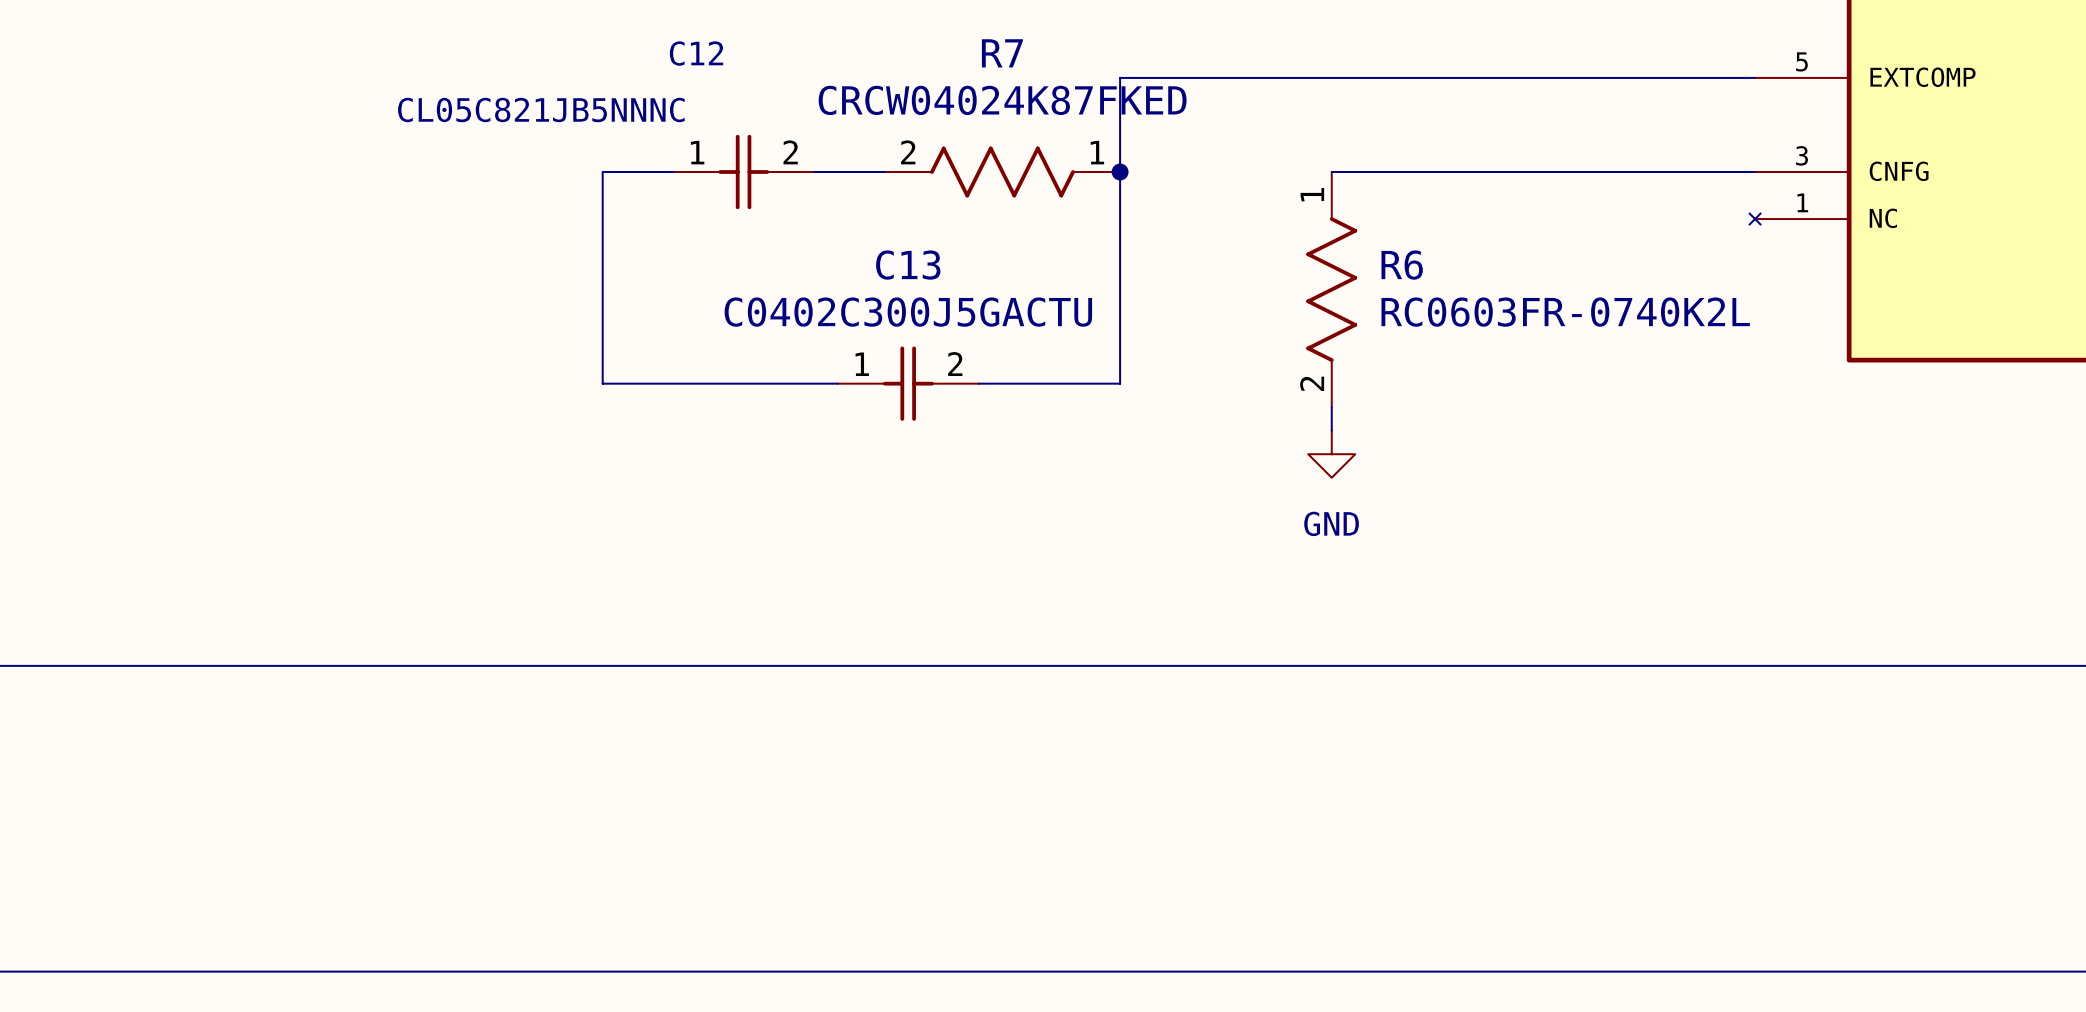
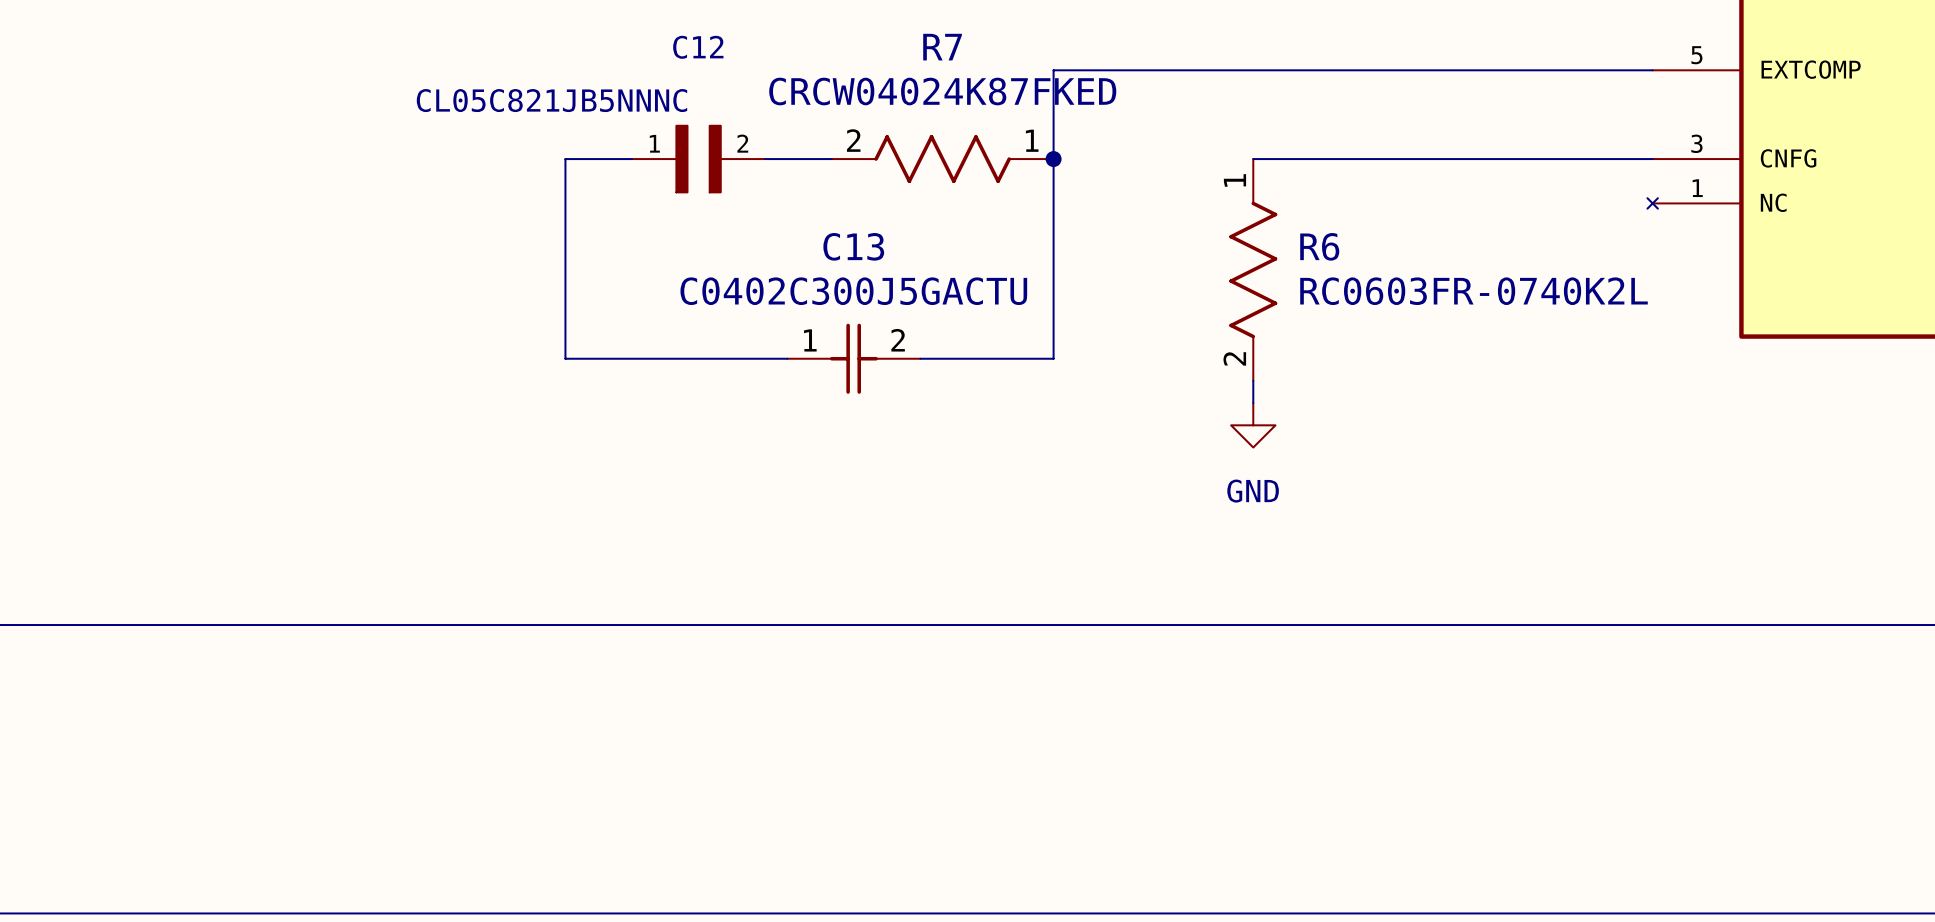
C12 name position: C12 (696, 53) -> C12 (698, 47)
C12 value position: CL05C821JB5NNNC (541, 109) -> CL05C821JB5NNNC (551, 100)
C12 symbol: [673, 134, 815, 210] -> [632, 124, 766, 194]

